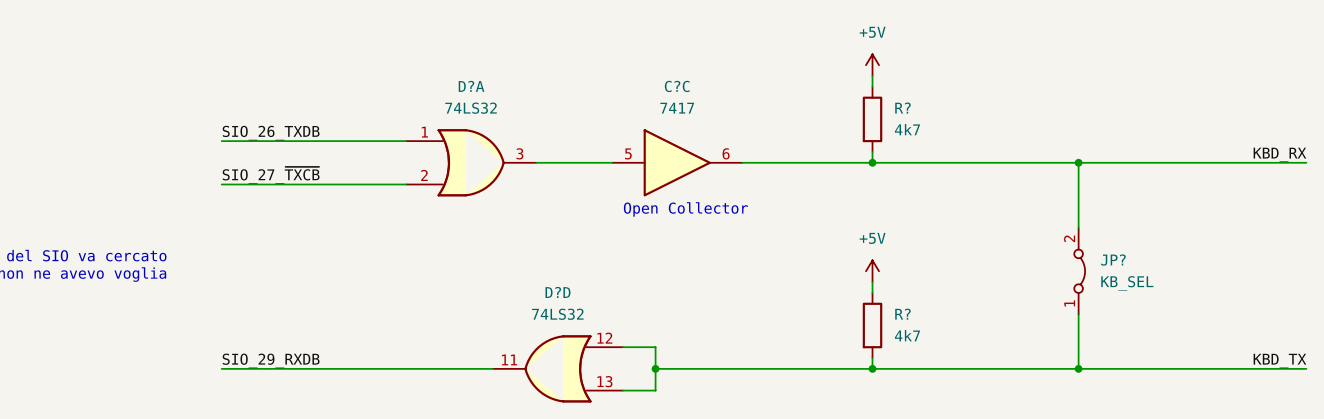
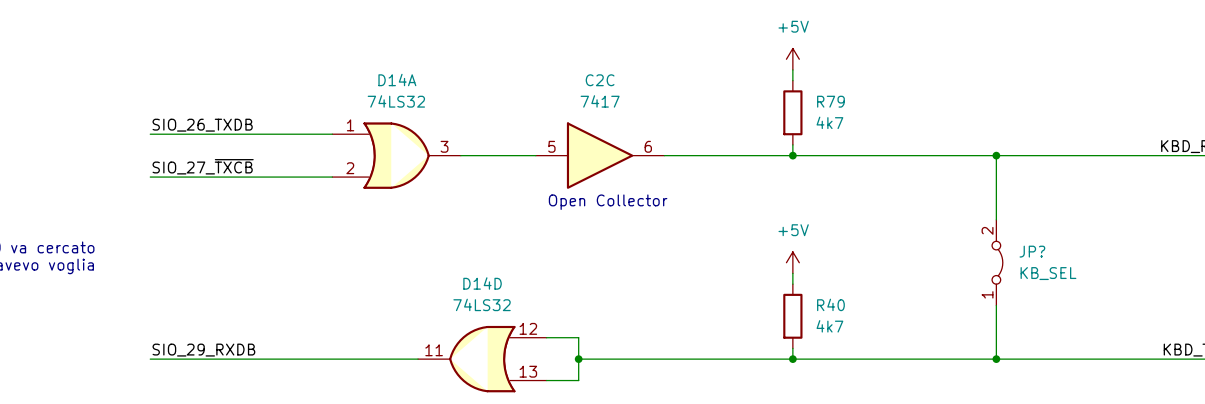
D?A name: D?A (471, 86) -> D14A (397, 80)
C?C name: C?C (677, 86) -> C2C (600, 80)
R? name: R? (902, 108) -> R79 (830, 101)
D?D name: D?D (557, 292) -> D14D (482, 283)
R? name: R? (902, 314) -> R40 (830, 304)

